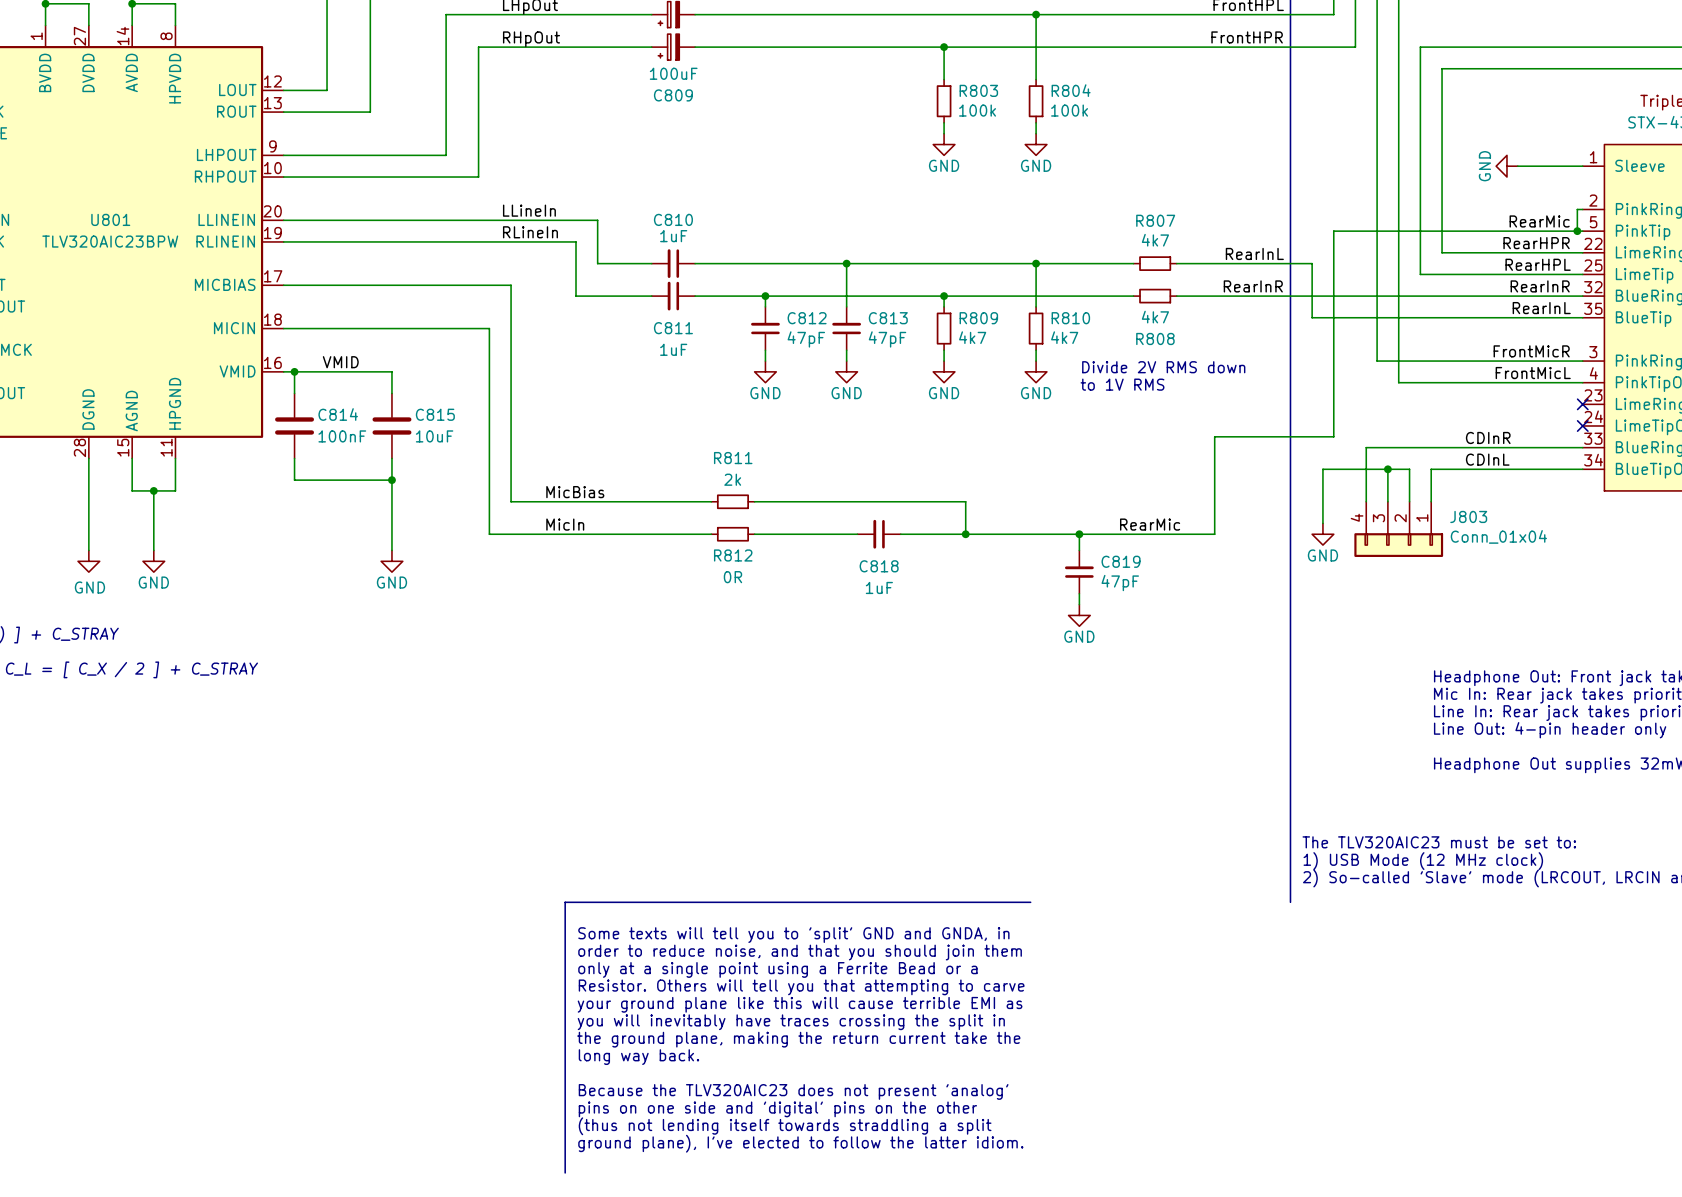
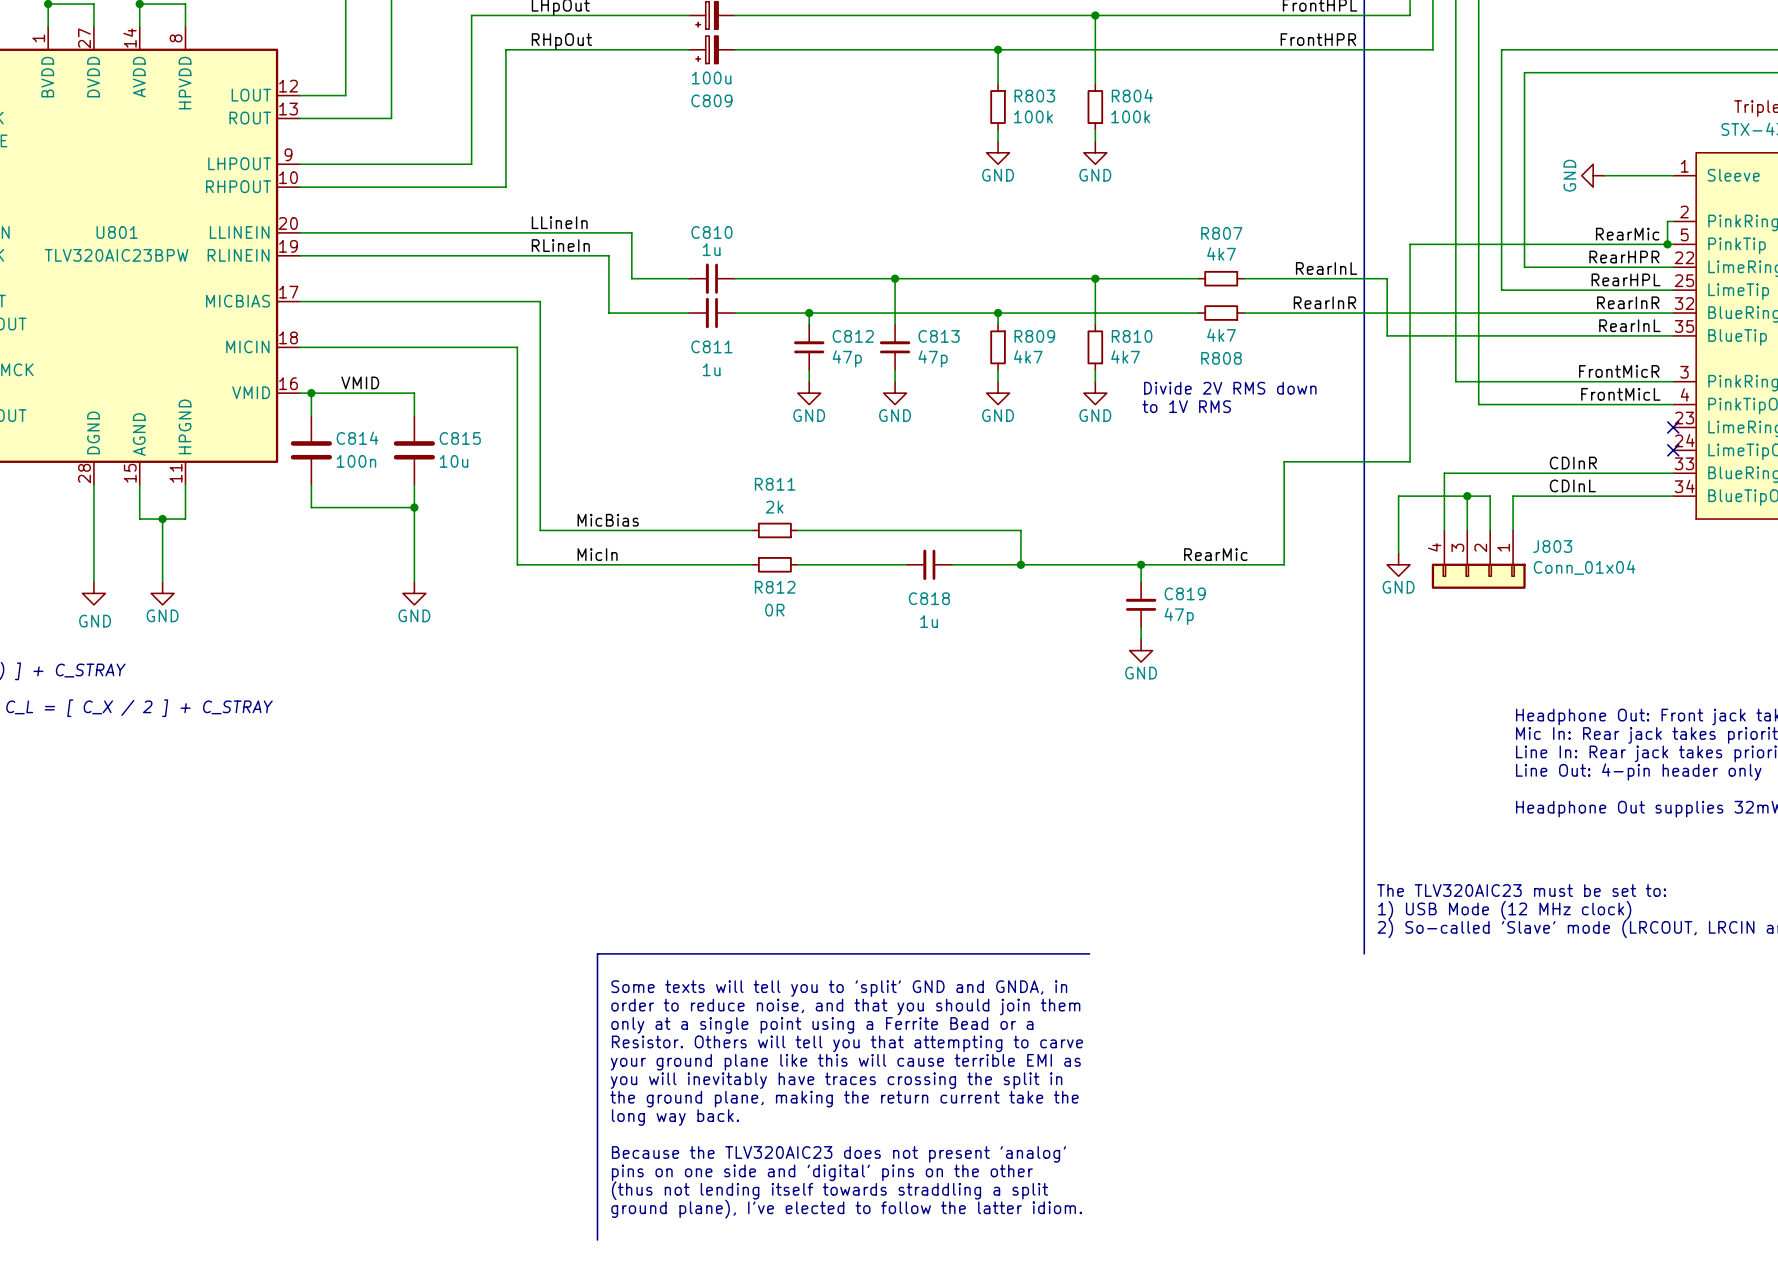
C809 value: 100uF (673, 73) -> 100u (711, 77)
C810 value: 1uF (673, 236) -> 1u (711, 249)
C812 value: 47pF (806, 339) -> 47p (847, 358)
C813 value: 47pF (887, 339) -> 47p (933, 358)
C811 value: 1uF (673, 349) -> 1u (711, 369)
C814 value: 100nF (342, 436) -> 100n (356, 461)
C815 value: 10uF (434, 436) -> 10u (453, 461)
C819 value: 47pF (1120, 583) -> 47p (1179, 616)
C818 value: 1uF (879, 587) -> 1u (929, 621)

